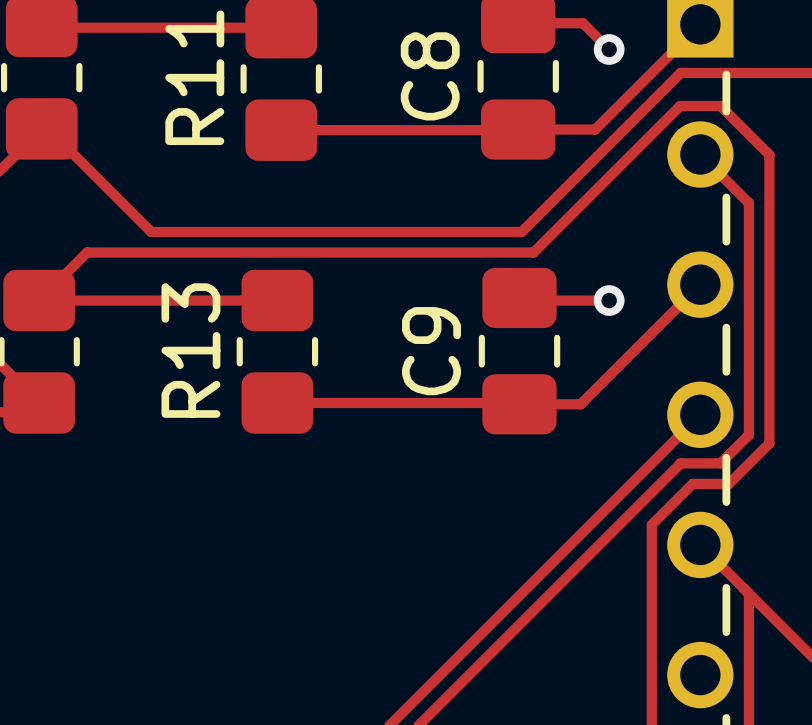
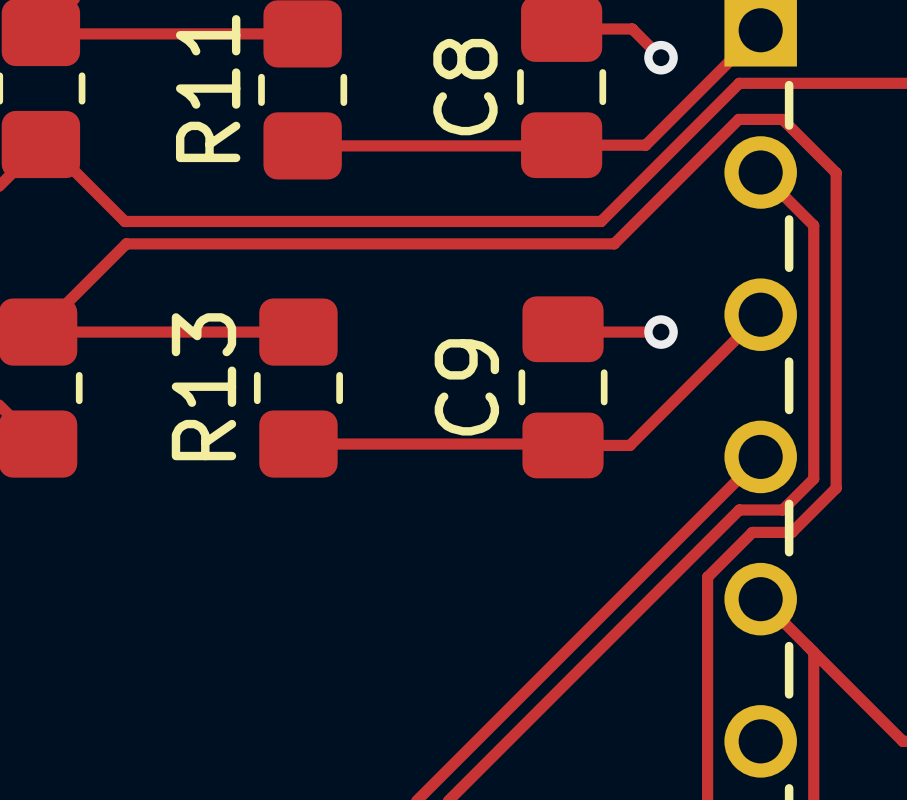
track: (118, 199) (151, 232) (521, 232) (554, 199) -> (124, 221) (601, 221)
track: (566, 219) (533, 252) (87, 252) -> (614, 243) (126, 243) (90, 279)

